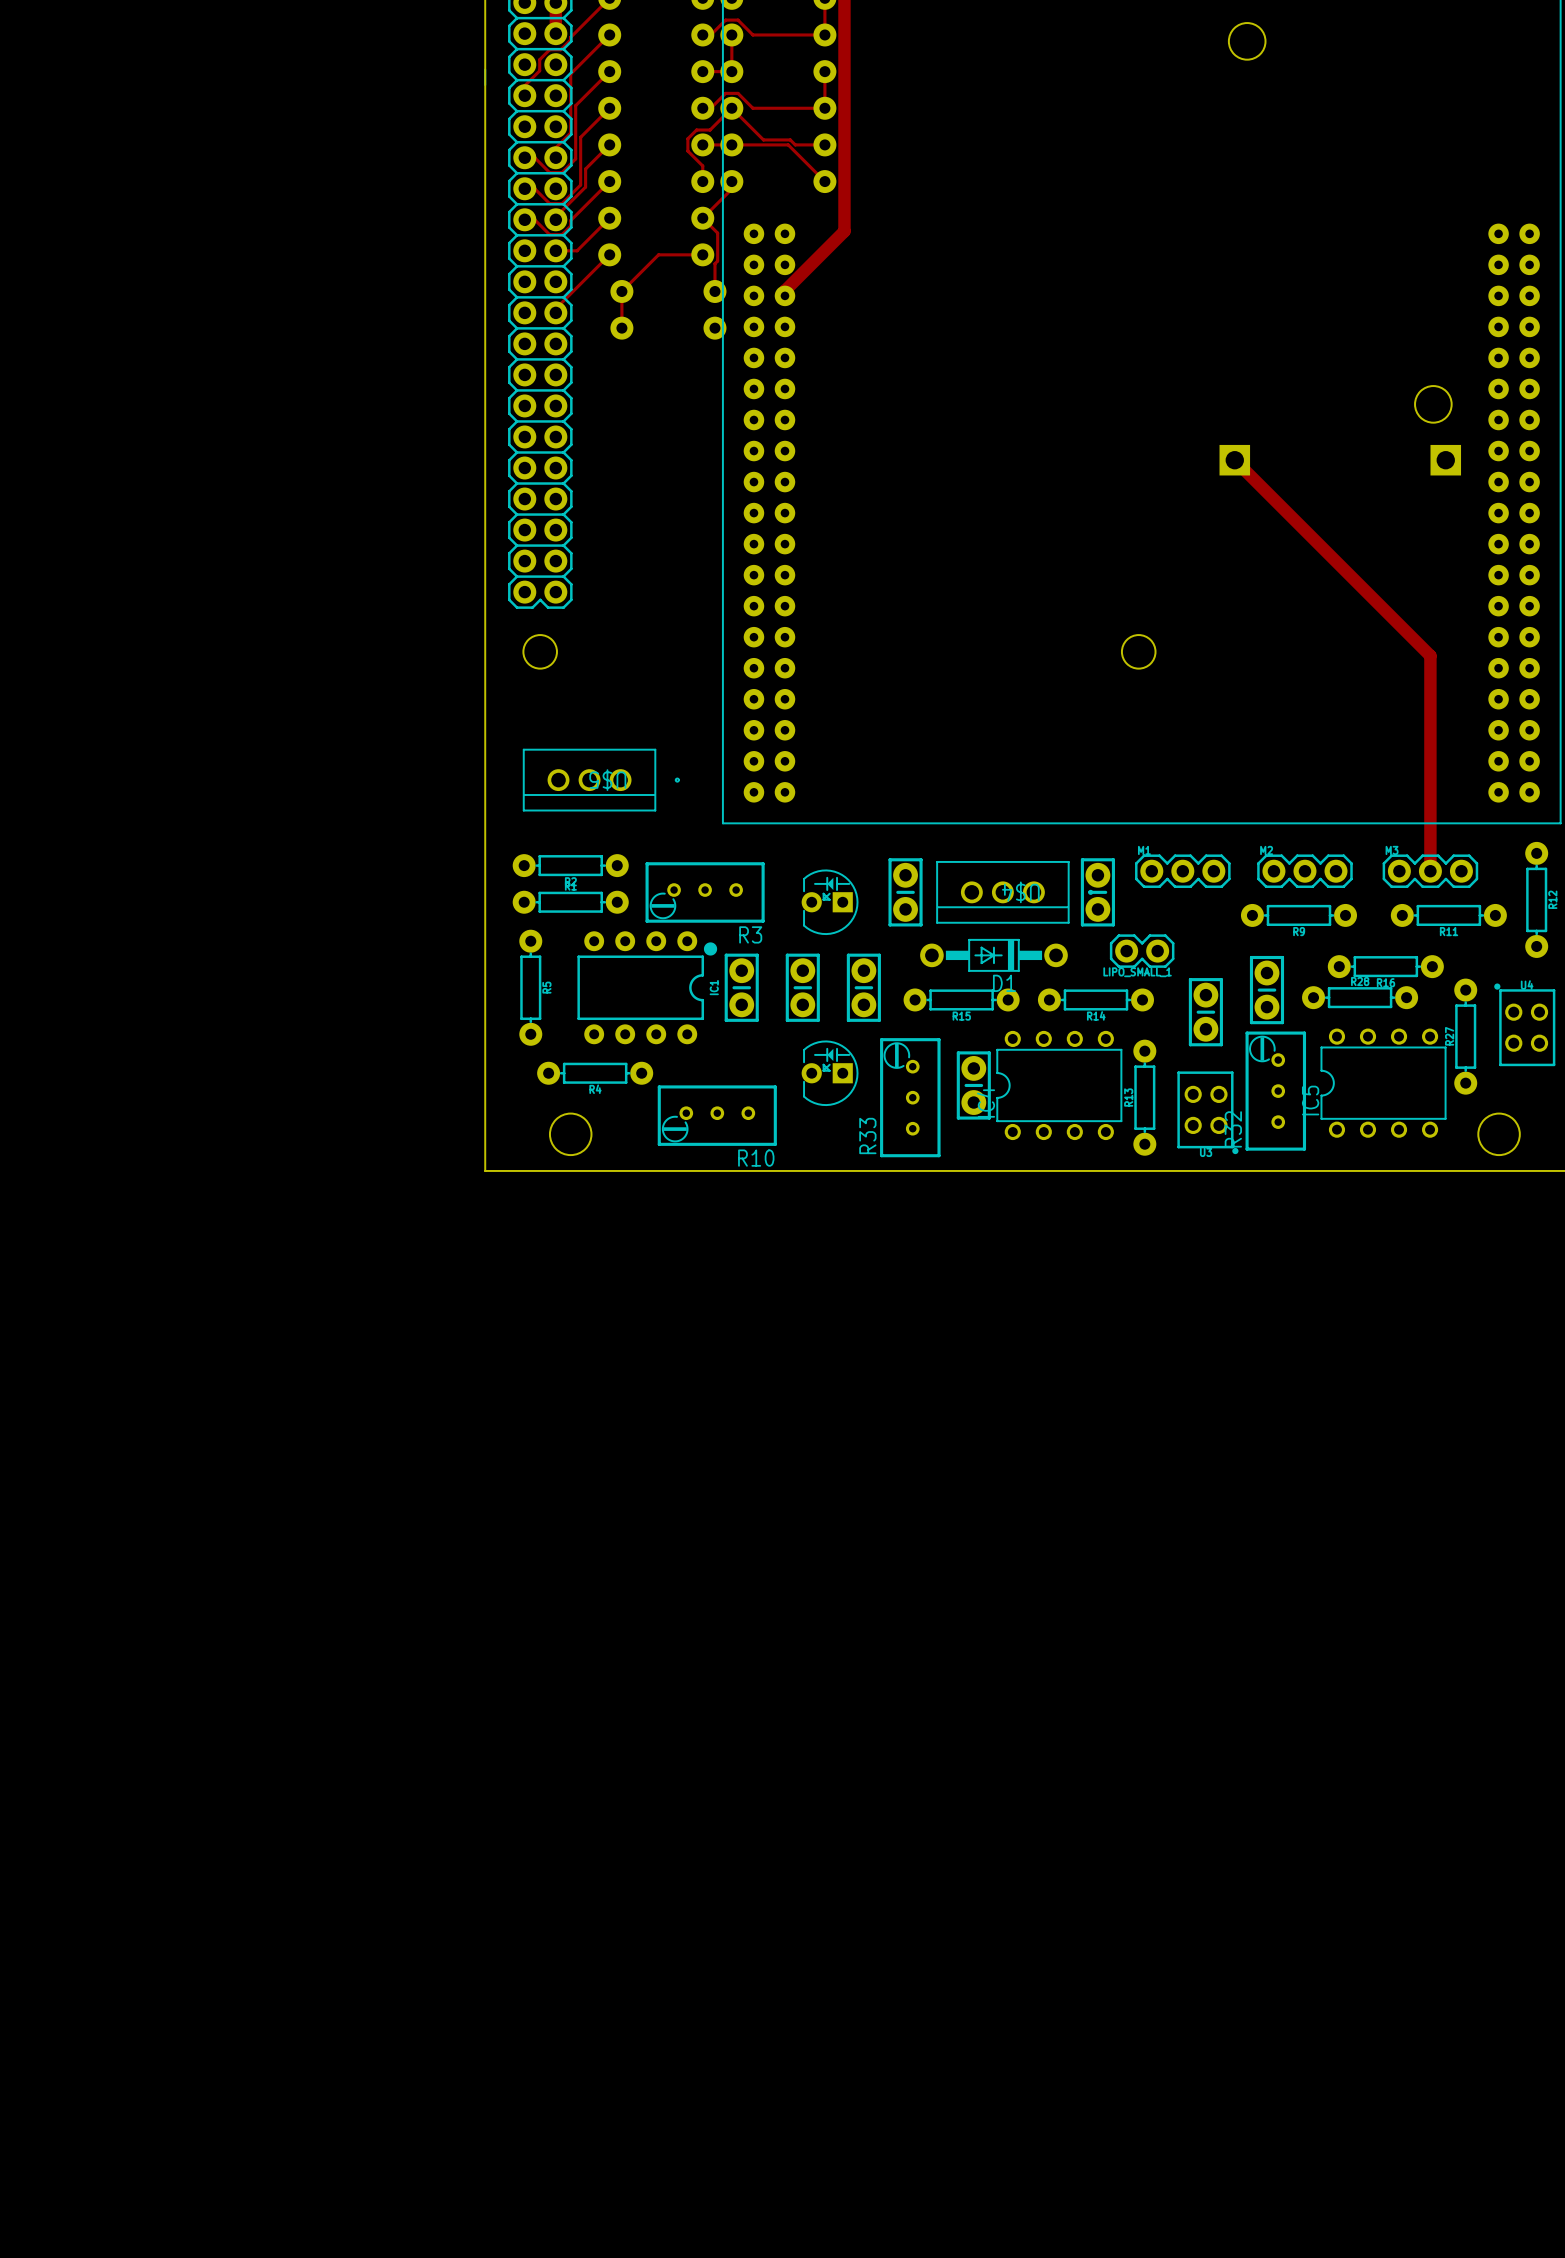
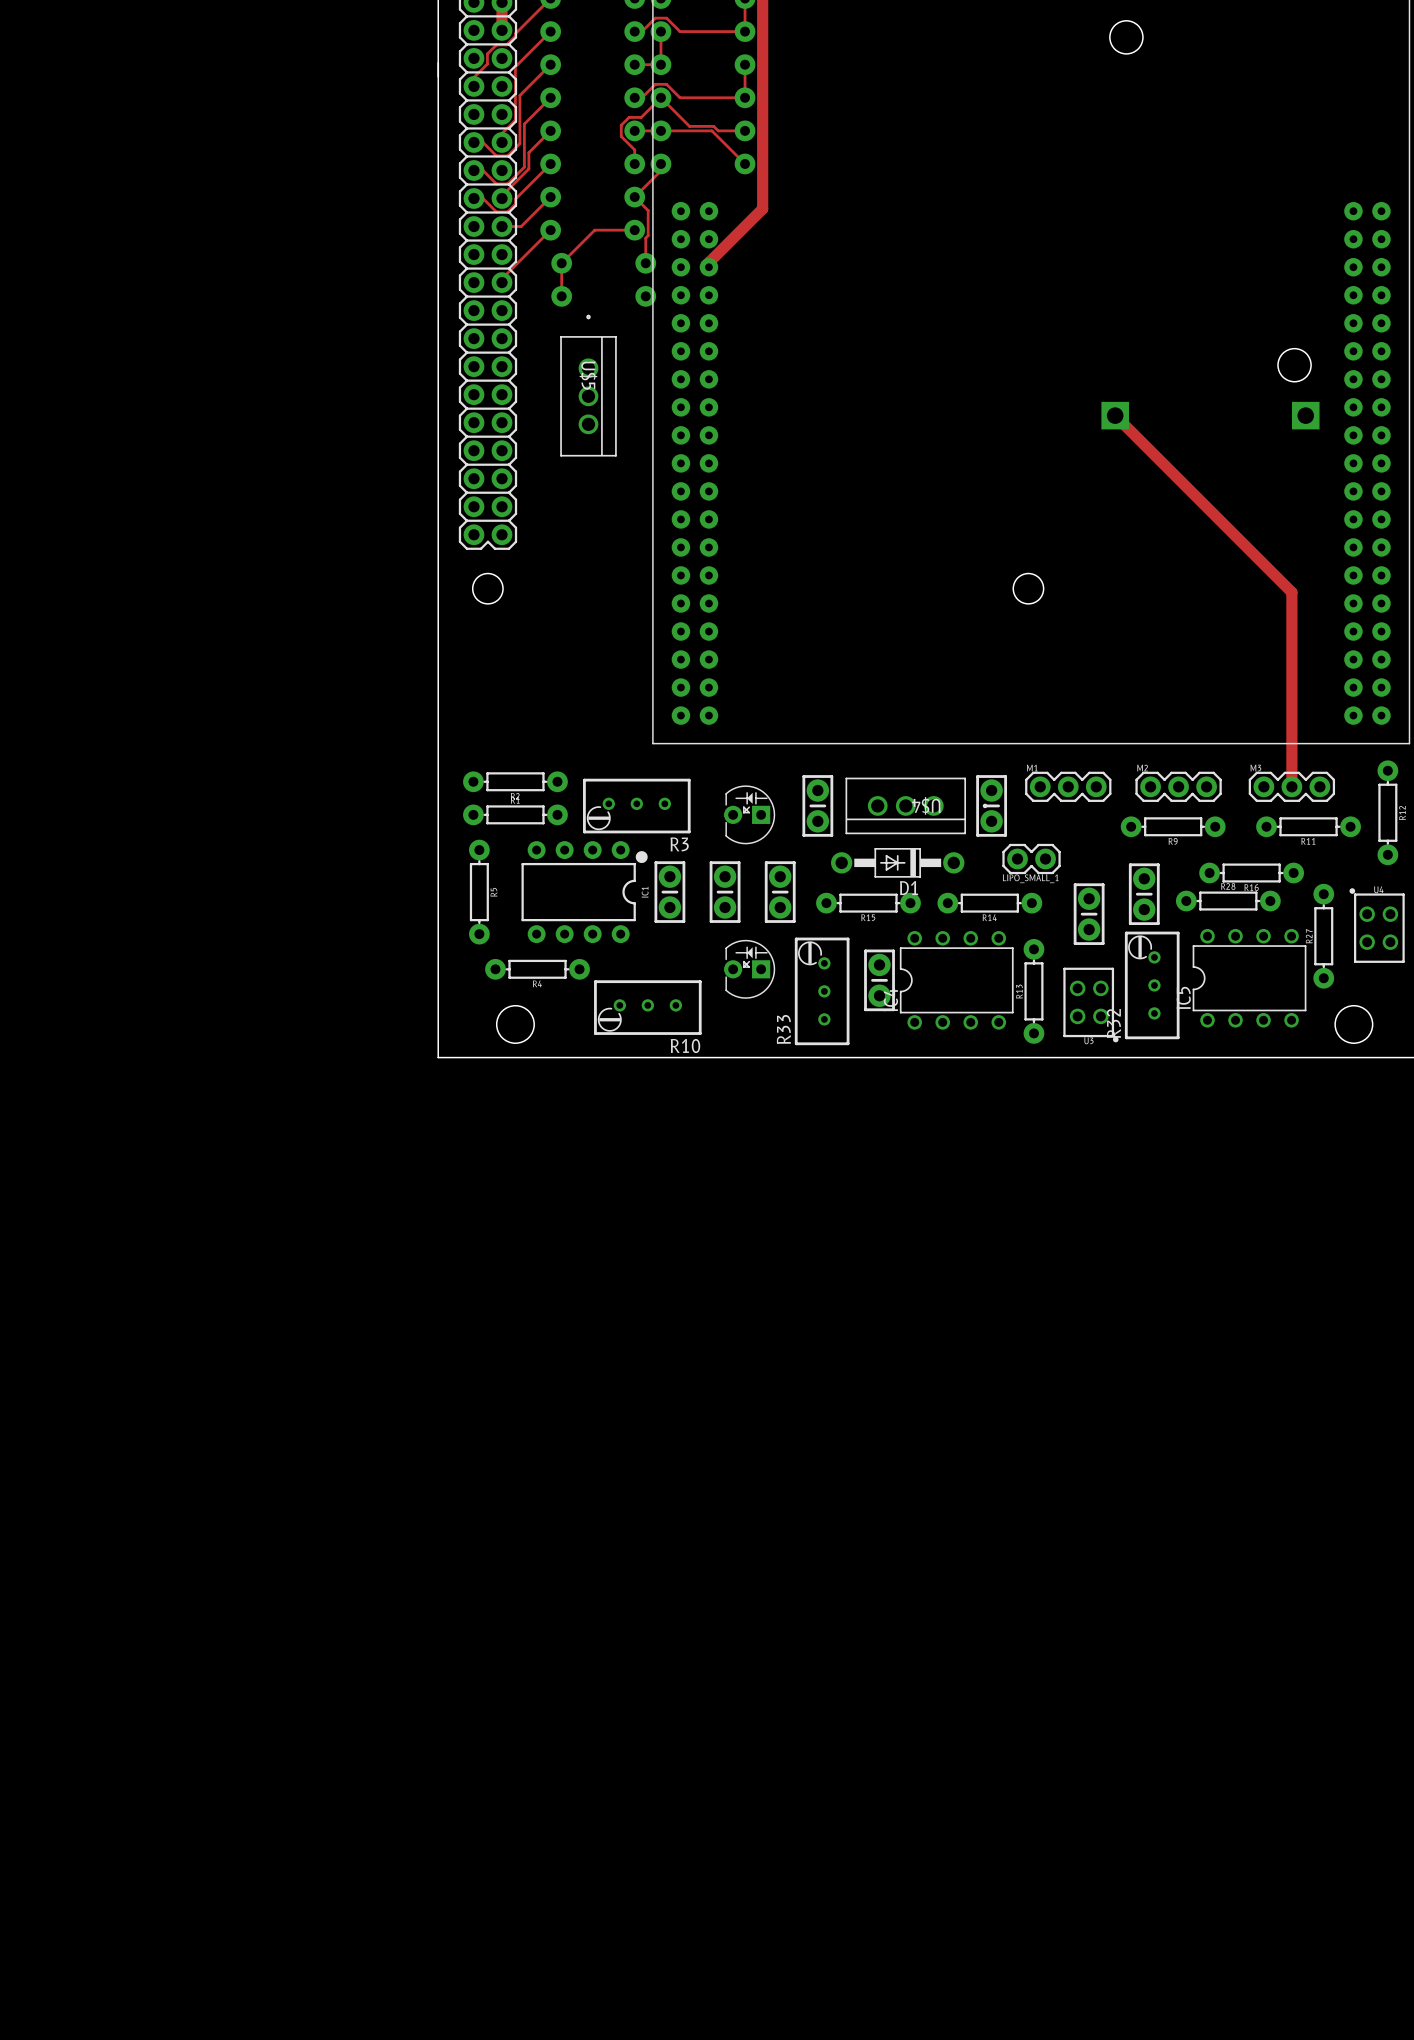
U$5 rotation: 0° (601, 780) -> 90° counterclockwise (588, 385)
U$5 position: (601, 780) -> (588, 385)

